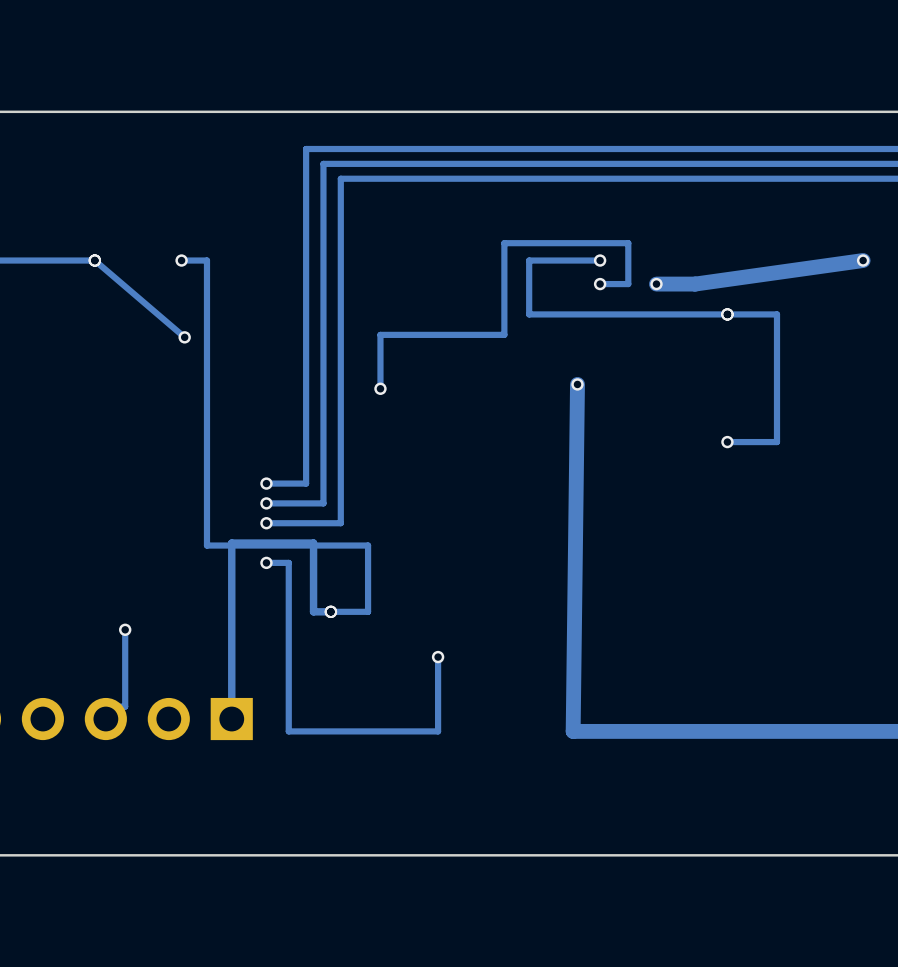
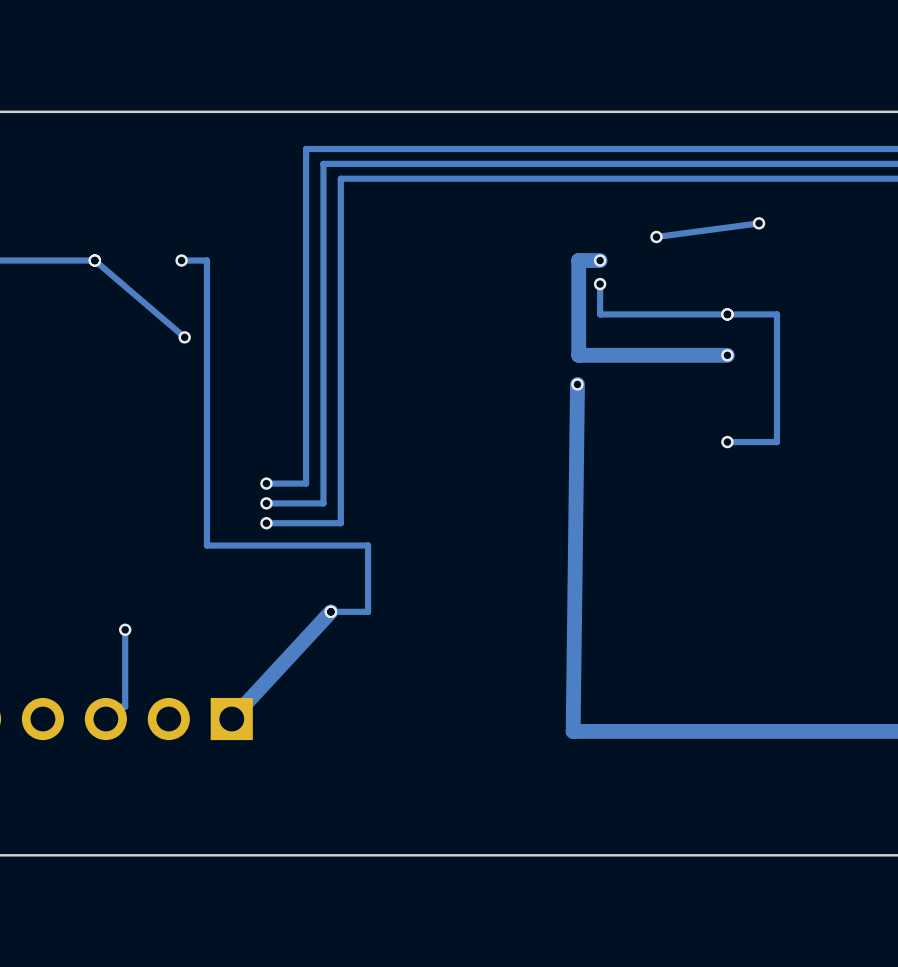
track: none -> (759, 223) (656, 236)
via: none -> (759, 223)
track: (578, 260) (529, 260) (529, 314) (600, 314) -> (600, 284) (600, 314)
track: none -> (578, 260) (578, 355) (727, 355)
track width: thin (600, 260) (578, 260) -> thick (600, 260) (578, 260)
track: (863, 260) (695, 284) (656, 284) -> none
via: (863, 260) -> none
track: (600, 284) (628, 284) (628, 243) (504, 243) (504, 334) (380, 334) (380, 388) -> none
via position: (656, 284) -> (656, 236)
via: none -> (727, 355)
via: (380, 388) -> none
track: (266, 562) (288, 562) (288, 731) (438, 731) (438, 657) -> none
via: (266, 562) -> none
track: (330, 611) (313, 611) (313, 543) (231, 543) (231, 719) -> (330, 611) (231, 719)
via: (438, 657) -> none

